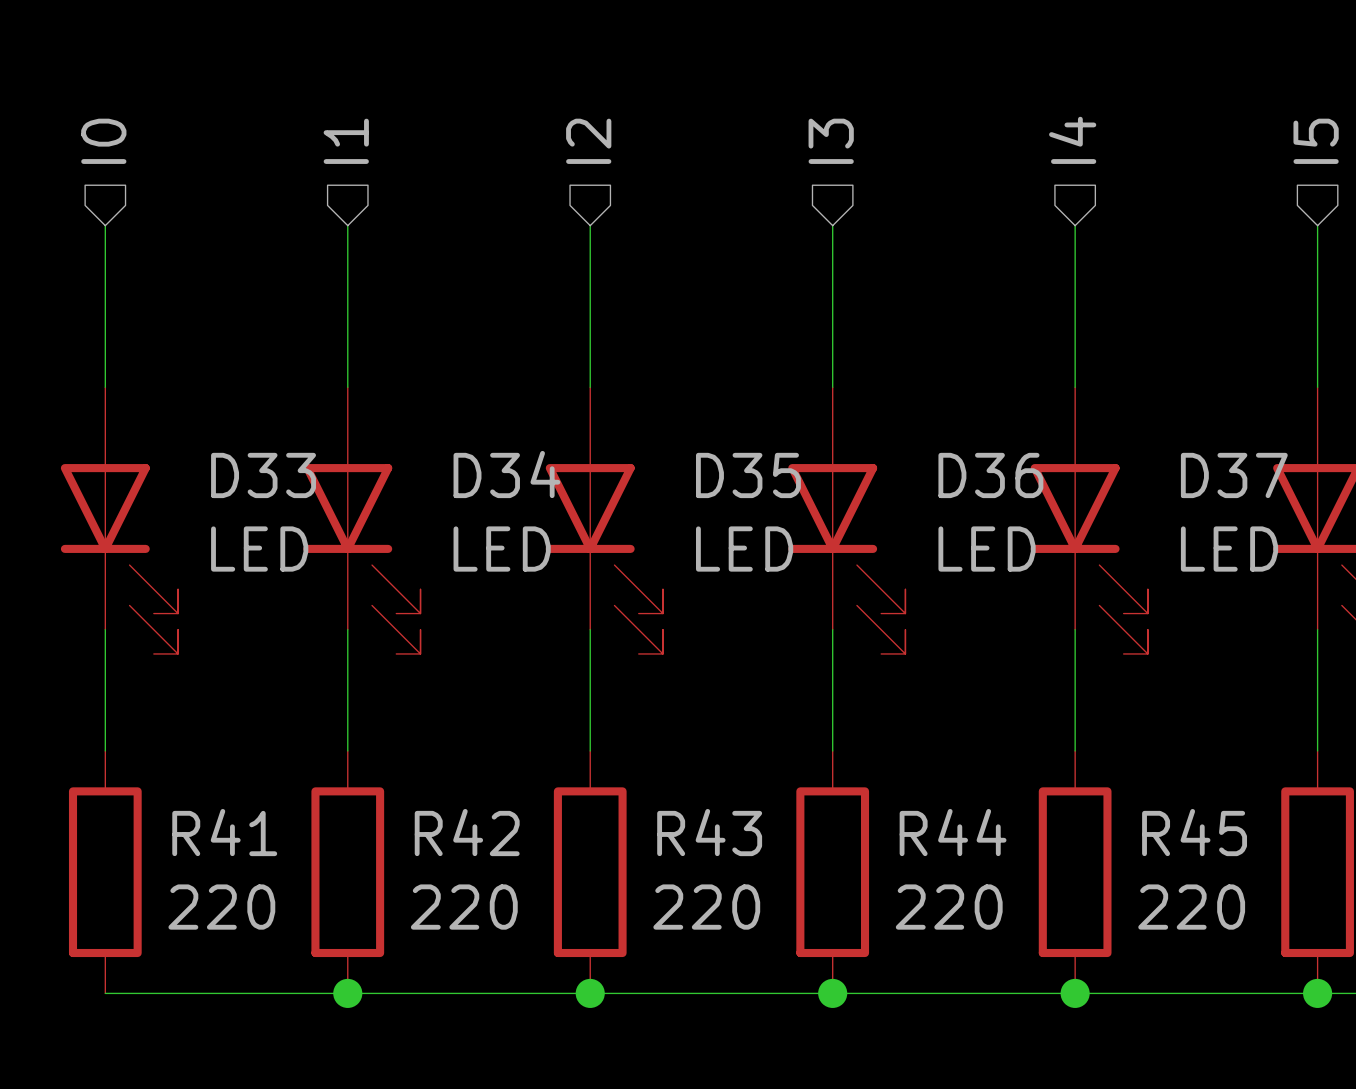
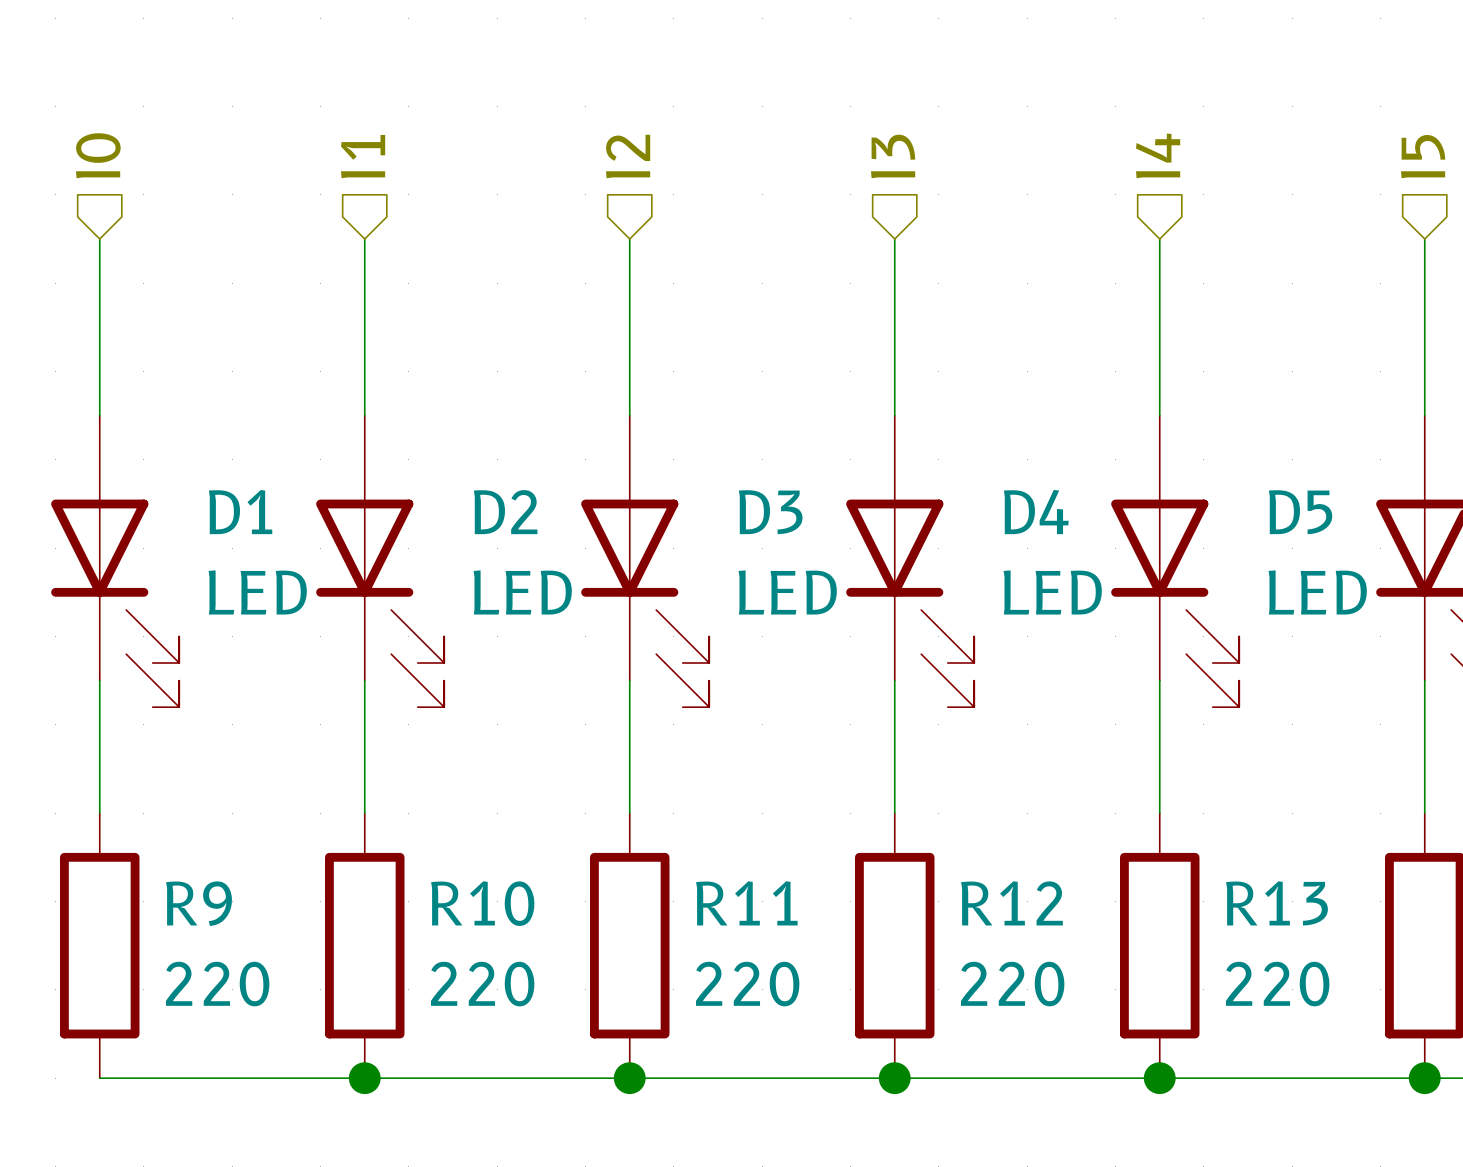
D34 name: D34 (506, 474) -> D2 (505, 512)
D33 name: D33 (263, 475) -> D1 (240, 512)
D35 name: D35 (748, 475) -> D3 (770, 512)
D36 name: D36 (990, 475) -> D4 (1036, 512)
D37 name: D37 (1234, 475) -> D5 (1300, 512)
R41 name: R41 (224, 832) -> R9 (199, 903)
R42 name: R42 (467, 832) -> R10 (482, 903)
R43 name: R43 (709, 832) -> R11 (746, 903)
R44 name: R44 (953, 832) -> R12 (1011, 903)
R45 name: R45 (1194, 832) -> R13 (1276, 903)

